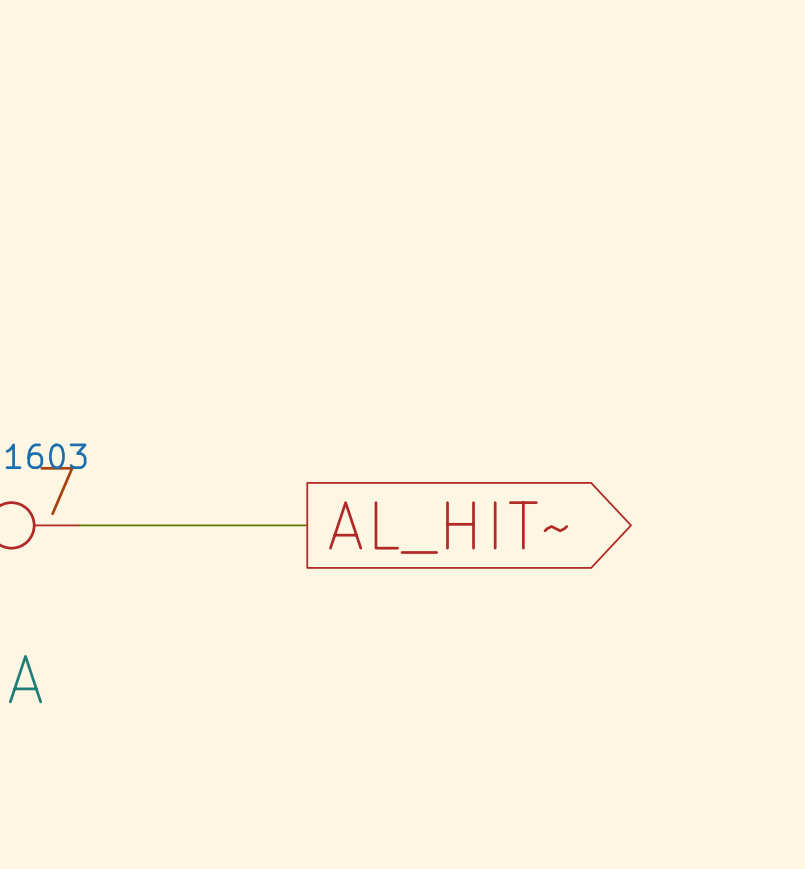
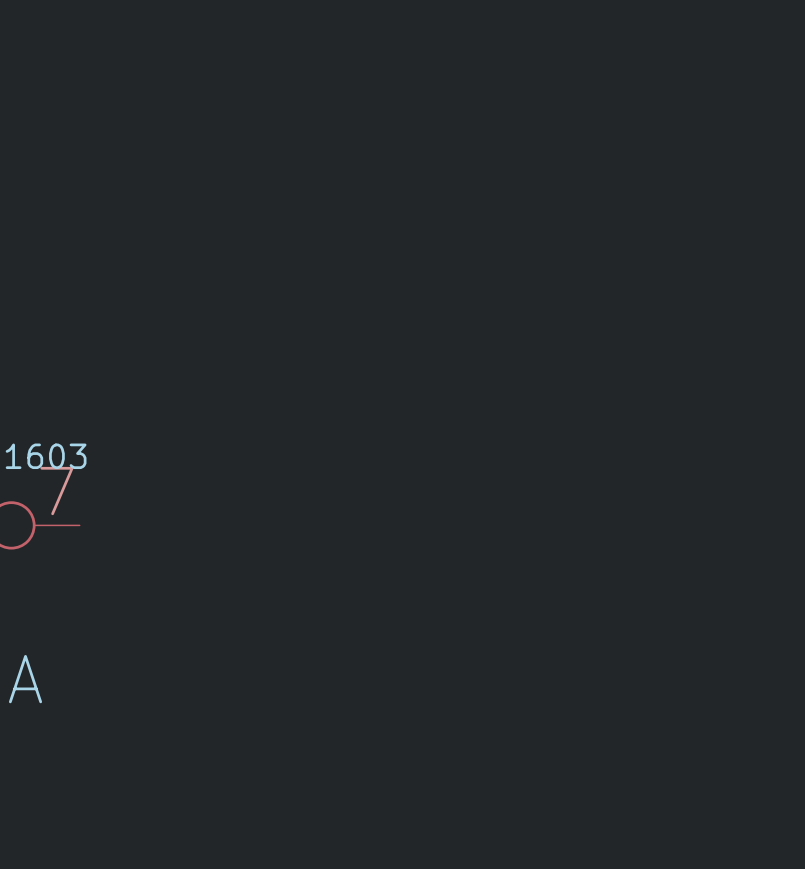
wire: (79, 525) (307, 525) -> none
global label: AL_HIT~ (448, 527) -> none

